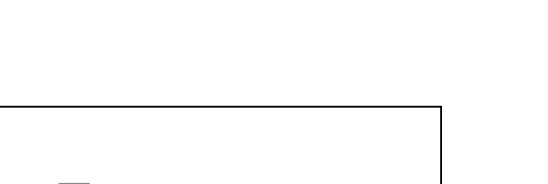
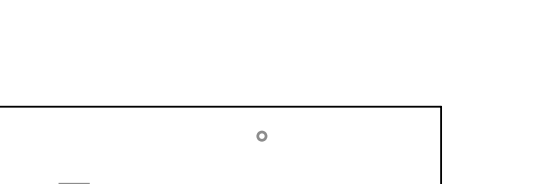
via: none -> (261, 136)

